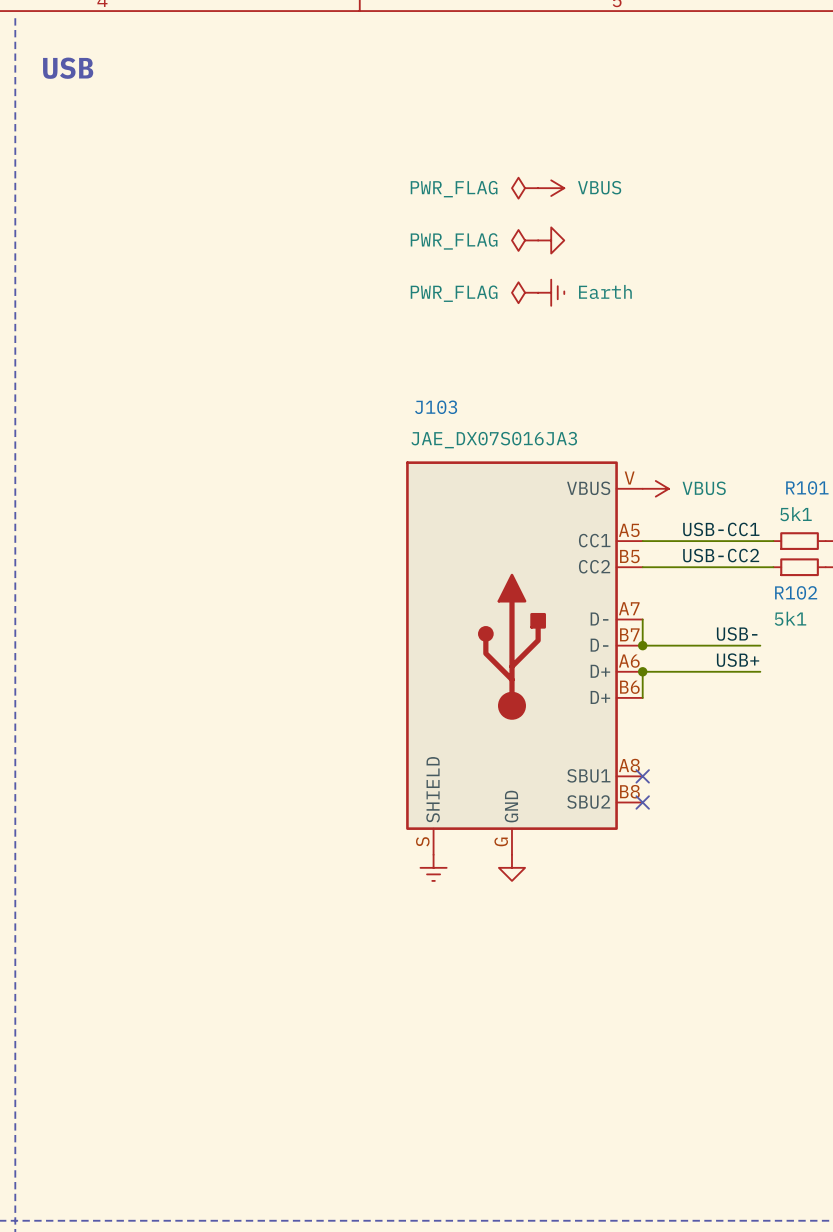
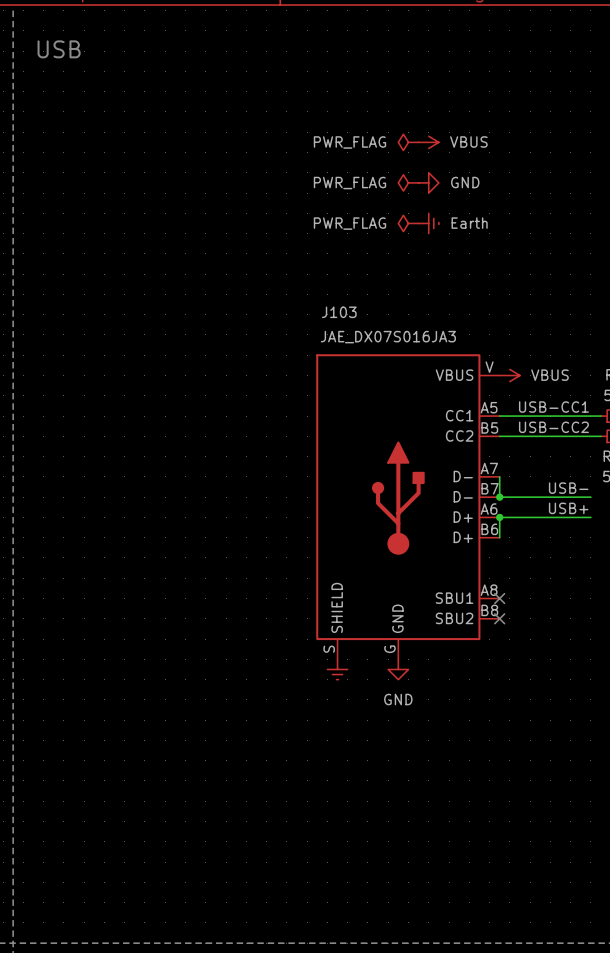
power symbol text: none -> GND (465, 182)
power symbol text: none -> GND (398, 699)

